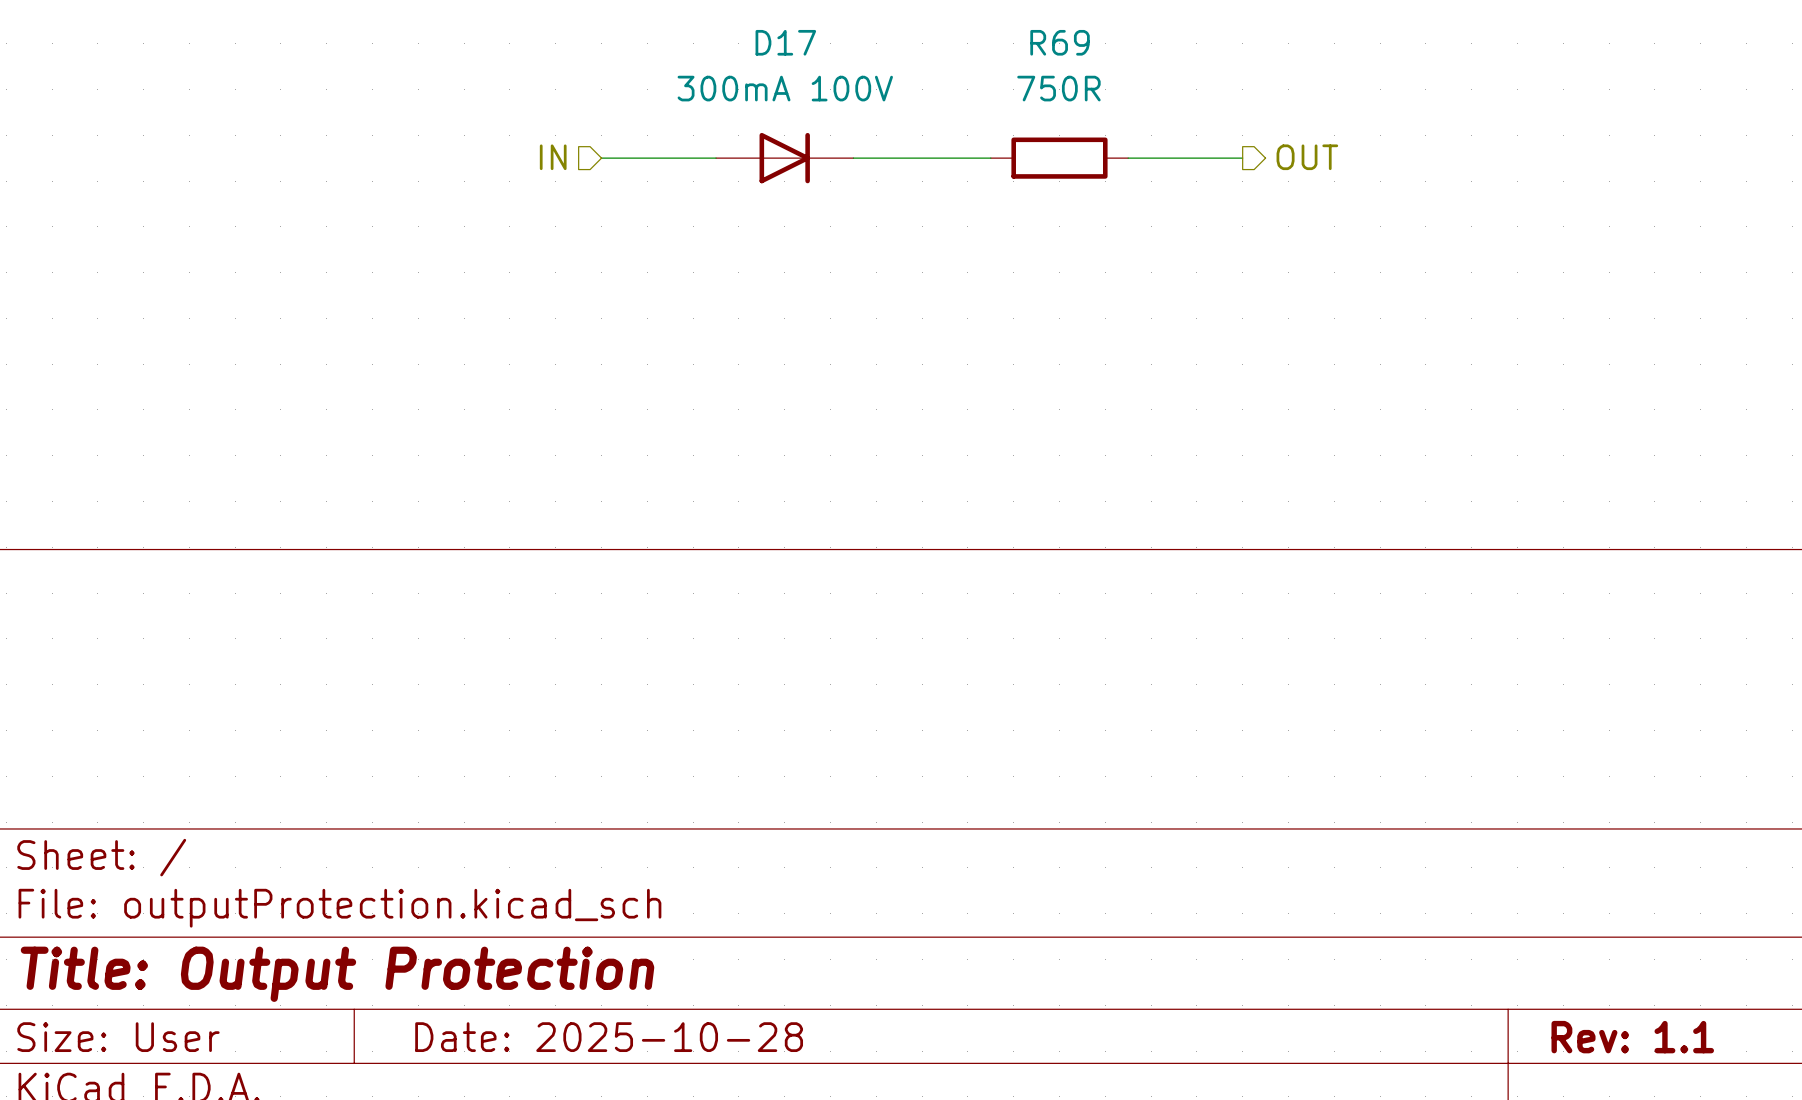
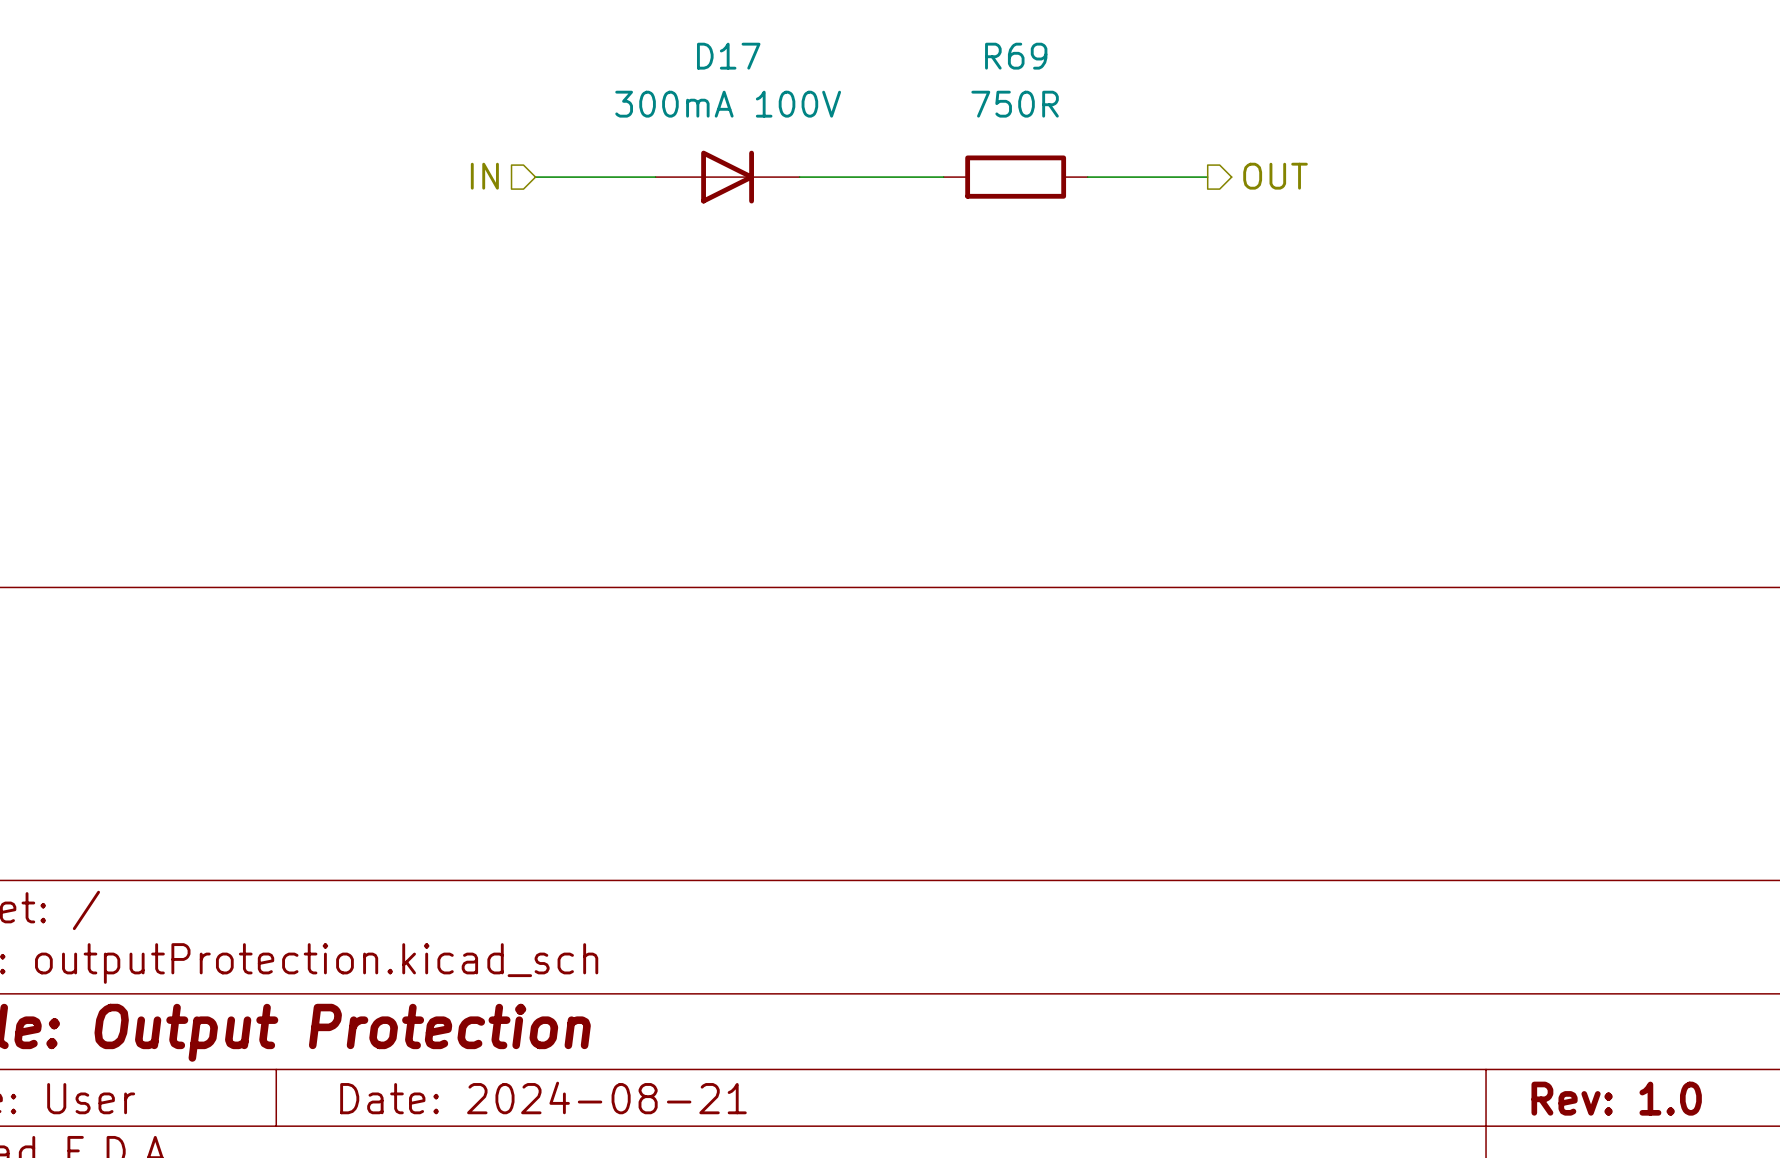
title block: Date: 2025-10-28 (609, 1037) -> Date: 2024-08-21 (543, 1097)
title block: Rev: 1.1 (1632, 1037) -> Rev: 1.0 (1616, 1098)

